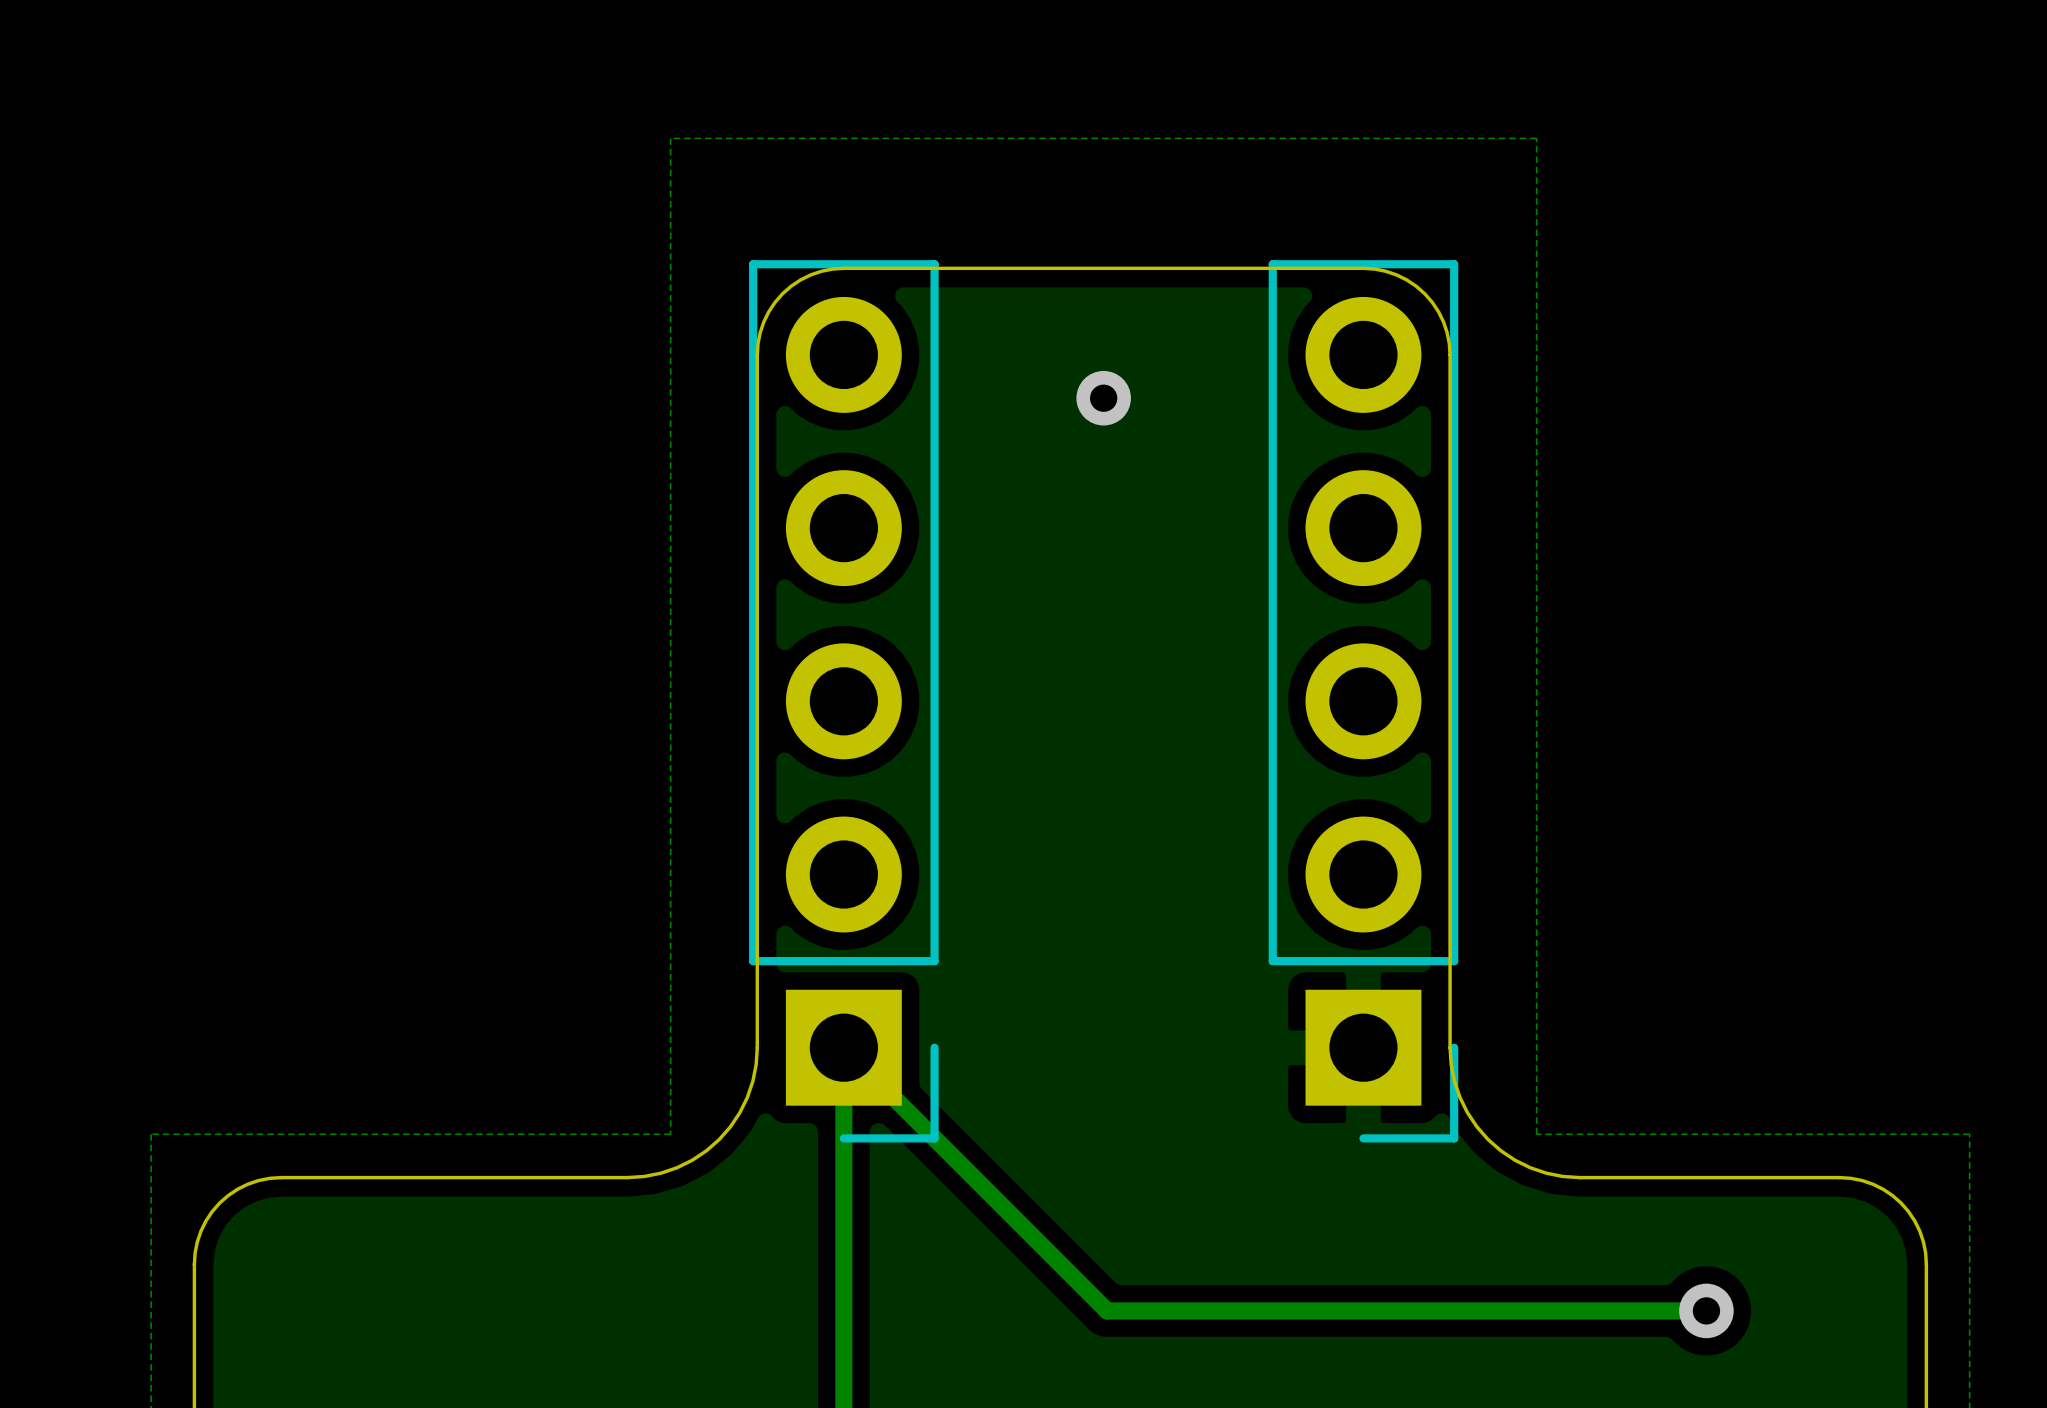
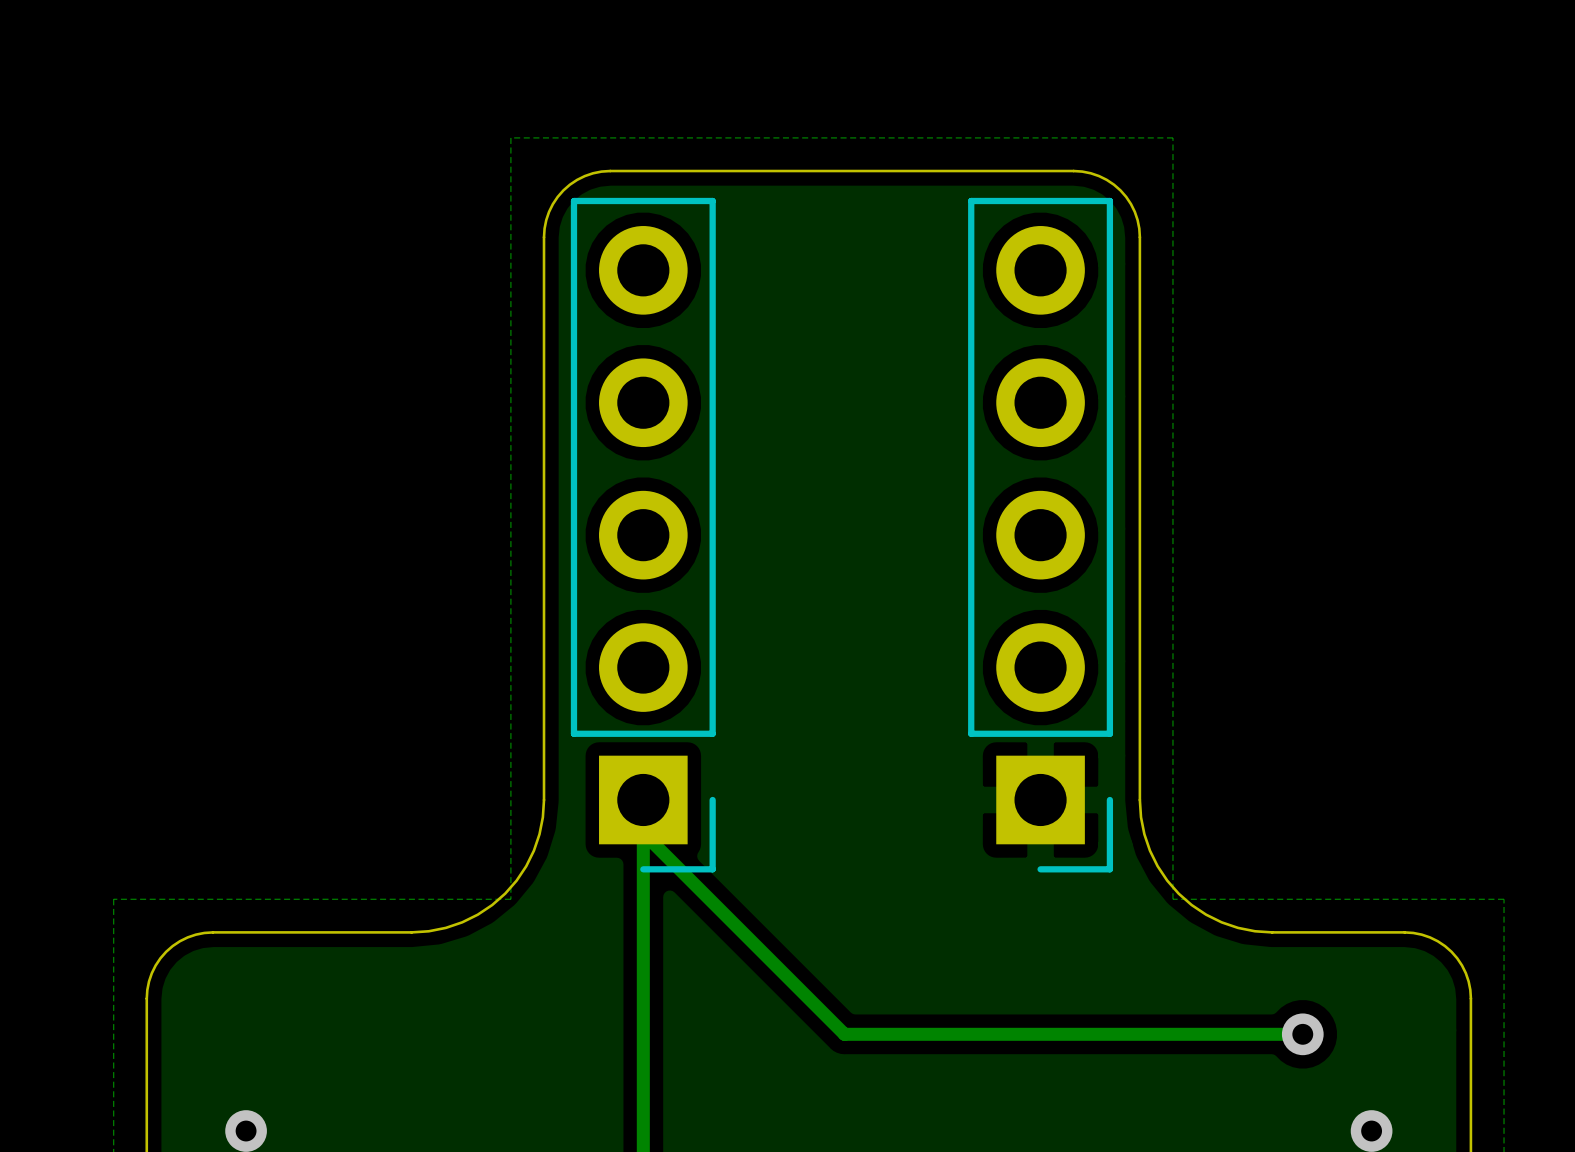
board edge: none -> (1139, 237) (1139, 799)
via: (1103, 398) -> none
part position: (843, 701) -> (643, 535)
part position: (1363, 701) -> (1040, 535)
board edge: none -> (1139, 799) (1144, 834) (1149, 850) (1167, 880) (1178, 893) (1191, 905) (1221, 922) (1238, 927) (1272, 932)
board edge: (1666, 1177) (1563, 1176) (1530, 1167) (1515, 1160) (1488, 1139) (1467, 1112) (1454, 1081) (1450, 1047) (1449, 343) (1438, 311) (1416, 286) (1385, 271) (1363, 268) (843, 268) (810, 274) (782, 293) (763, 321) (757, 354) (757, 1047) (752, 1081) (739, 1112) (719, 1139) (692, 1160) (677, 1167) (644, 1176) (540, 1177) -> (1139, 237) (1134, 211) (1126, 196) (1106, 179) (1082, 171) (610, 171) (584, 176) (563, 190) (549, 211) (544, 237) (544, 799) (539, 834) (533, 850) (516, 880) (492, 905) (477, 914) (445, 927) (411, 932)

